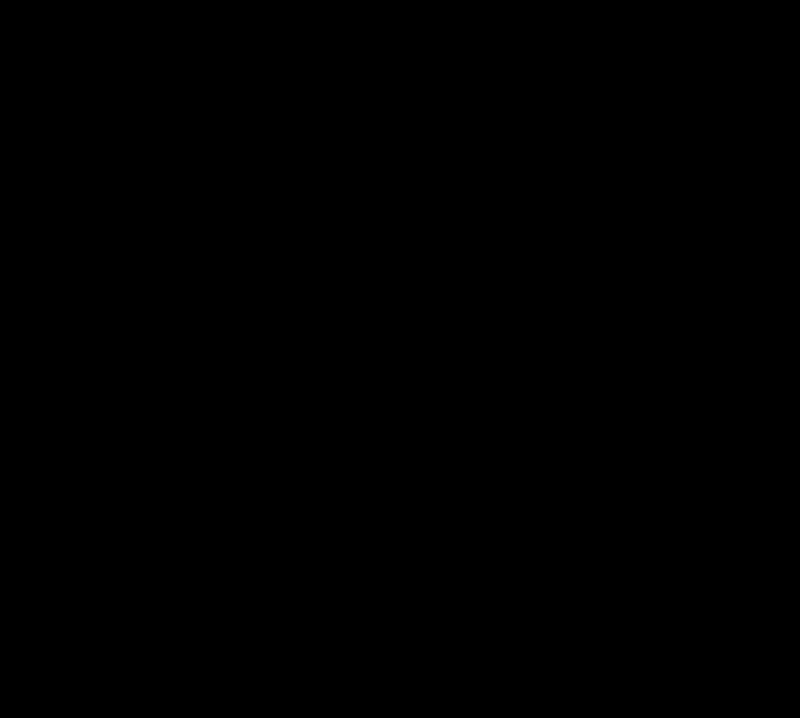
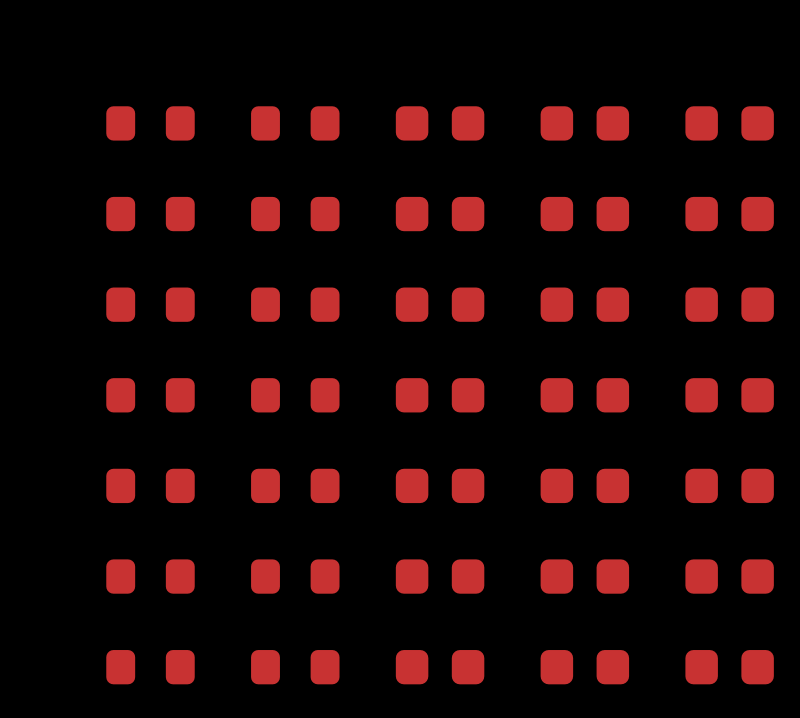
part: none -> (150, 123)
part: none -> (295, 123)
part: none -> (440, 123)
part: none -> (584, 123)
part: none -> (729, 123)
part: none -> (150, 214)
part: none -> (295, 214)
part: none -> (440, 214)
part: none -> (584, 214)
part: none -> (729, 214)
part: none -> (150, 304)
part: none -> (295, 304)
part: none -> (440, 304)
part: none -> (584, 304)
part: none -> (729, 304)
part: none -> (150, 395)
part: none -> (295, 395)
part: none -> (440, 395)
part: none -> (584, 395)
part: none -> (729, 395)
part: none -> (150, 485)
part: none -> (295, 485)
part: none -> (440, 485)
part: none -> (584, 485)
part: none -> (729, 485)
part: none -> (150, 576)
part: none -> (295, 576)
part: none -> (440, 576)
part: none -> (584, 576)
part: none -> (729, 576)
part: none -> (150, 667)
part: none -> (295, 667)
part: none -> (440, 667)
part: none -> (584, 667)
part: none -> (729, 667)

